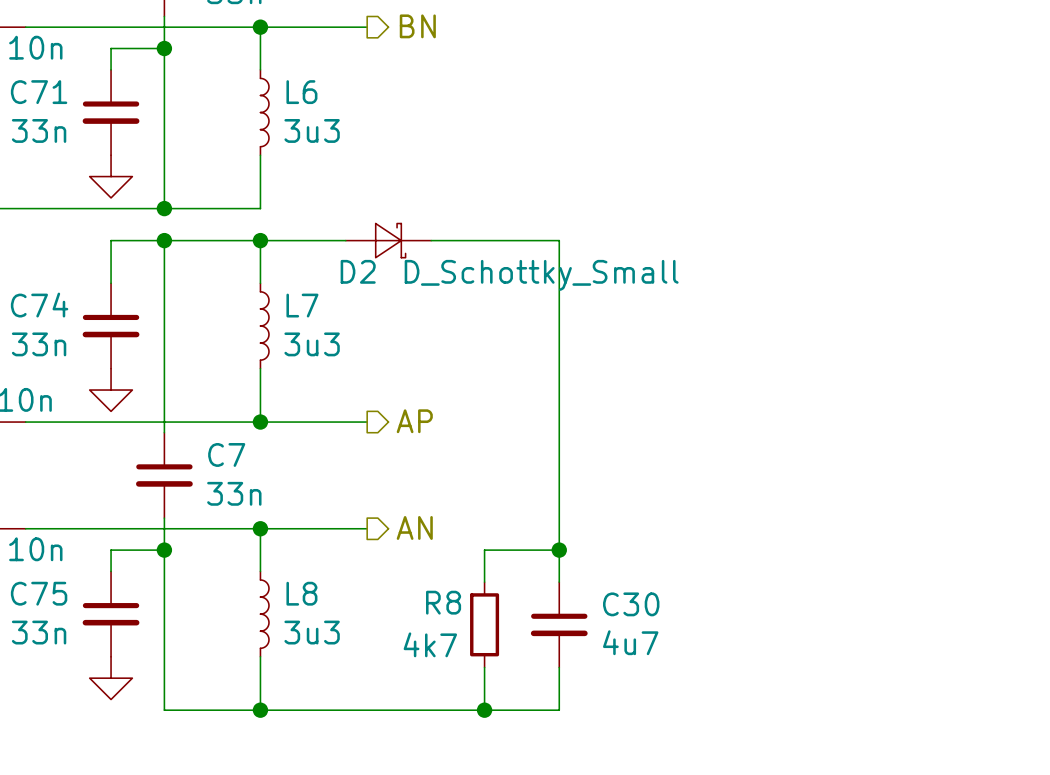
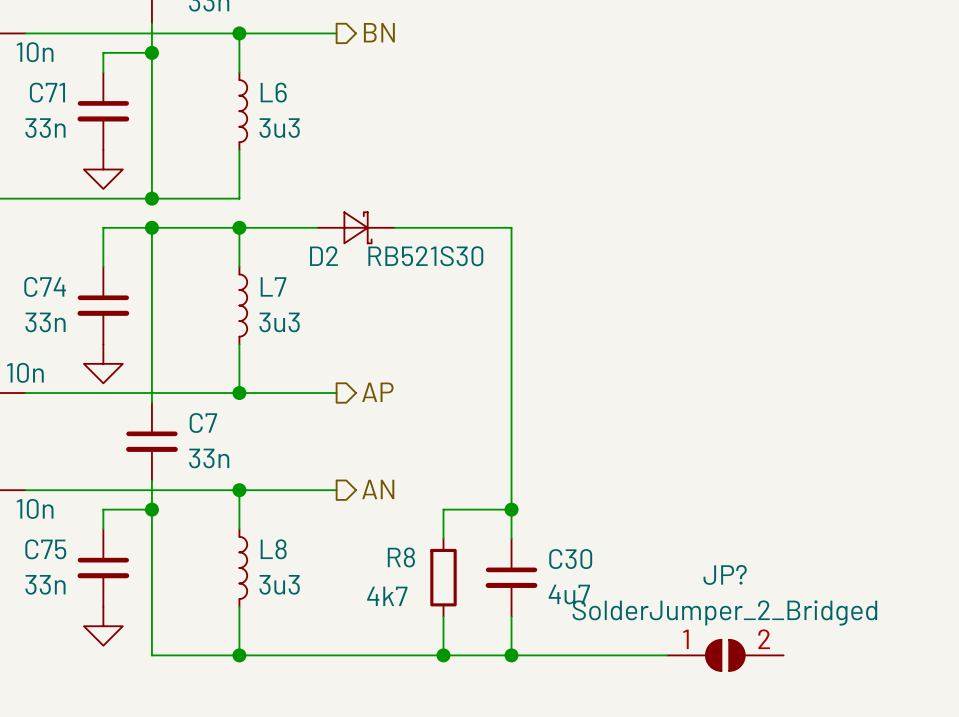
D2 value: D_Schottky_Small (541, 275) -> RB521S30 (425, 256)
wire: none -> (511, 655) (667, 655)
junction: none -> (511, 655)
JP?: none -> SolderJumper_2_Bridged (725, 655)

